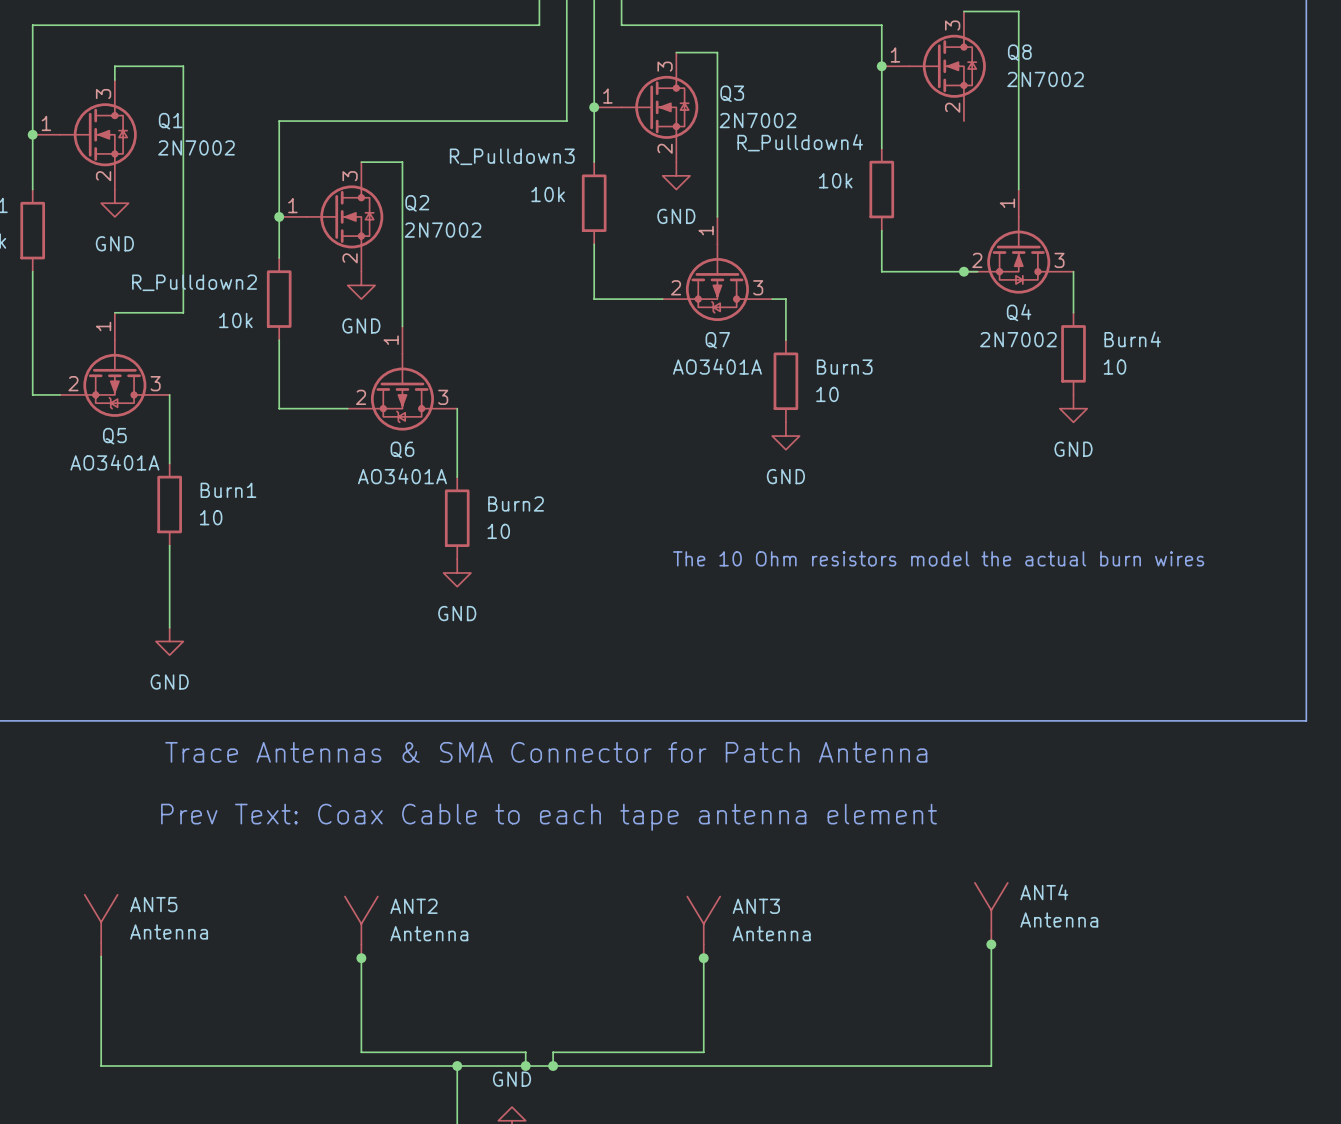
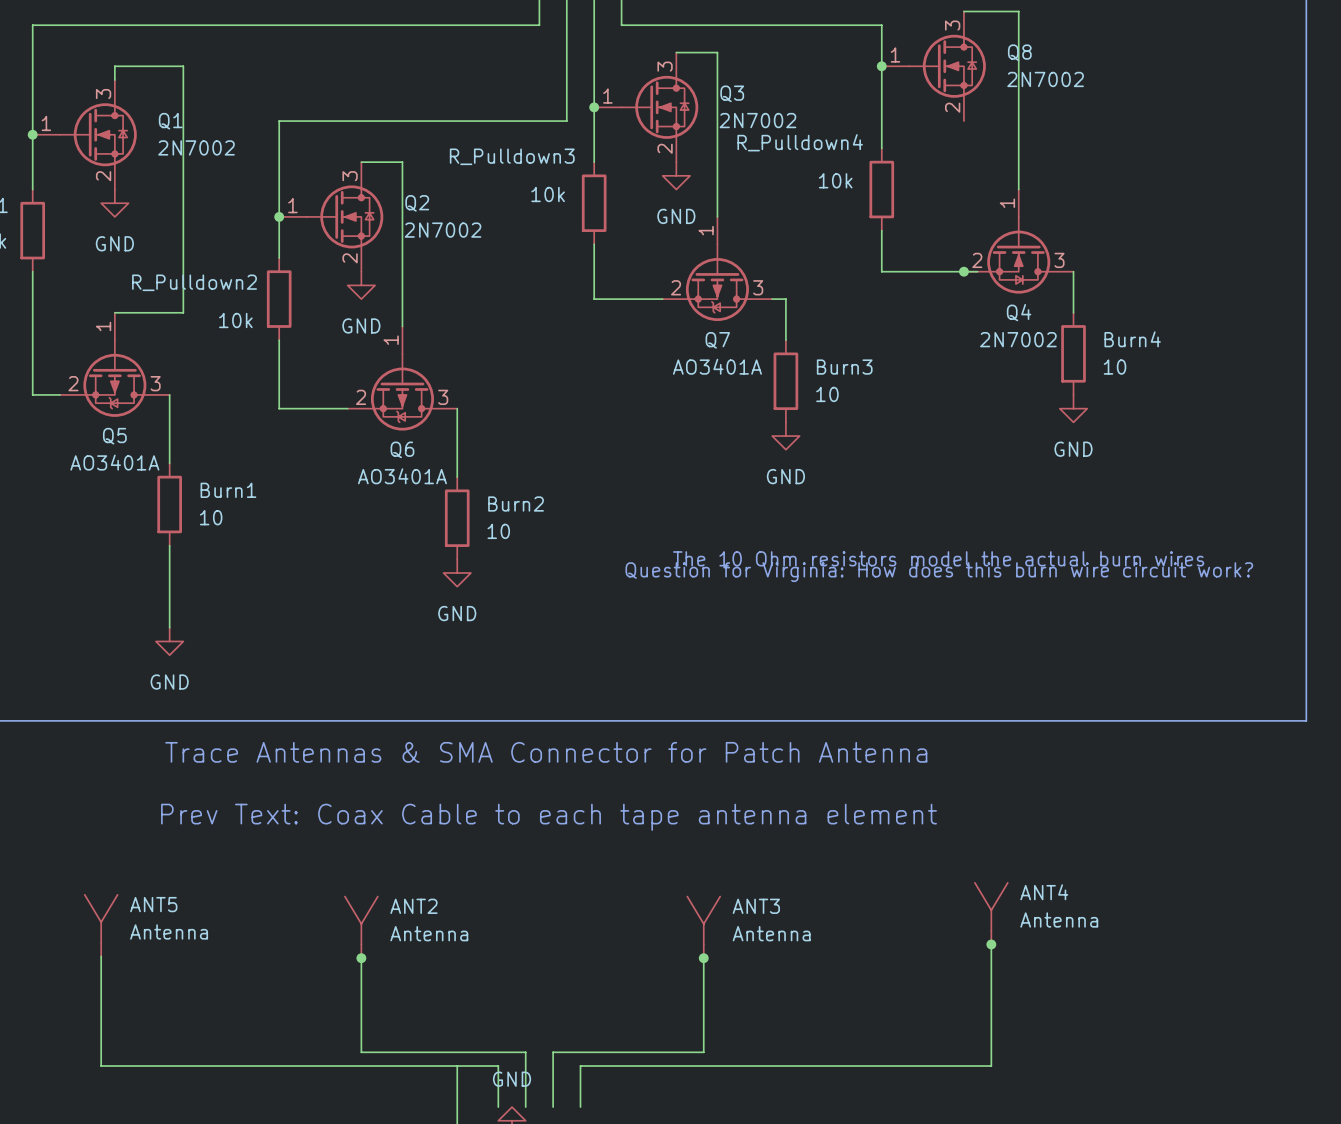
text: none -> Question for Virginia: How does this burn wire circuit work? (939, 572)
junction: (457, 1066) -> none
wire: (498, 1066) (580, 1066) -> (498, 1066) (498, 1107)
wire: none -> (525, 1066) (525, 1107)
junction: (525, 1066) -> none
wire: none -> (553, 1066) (553, 1107)
junction: (553, 1066) -> none
wire: none -> (580, 1066) (580, 1107)

